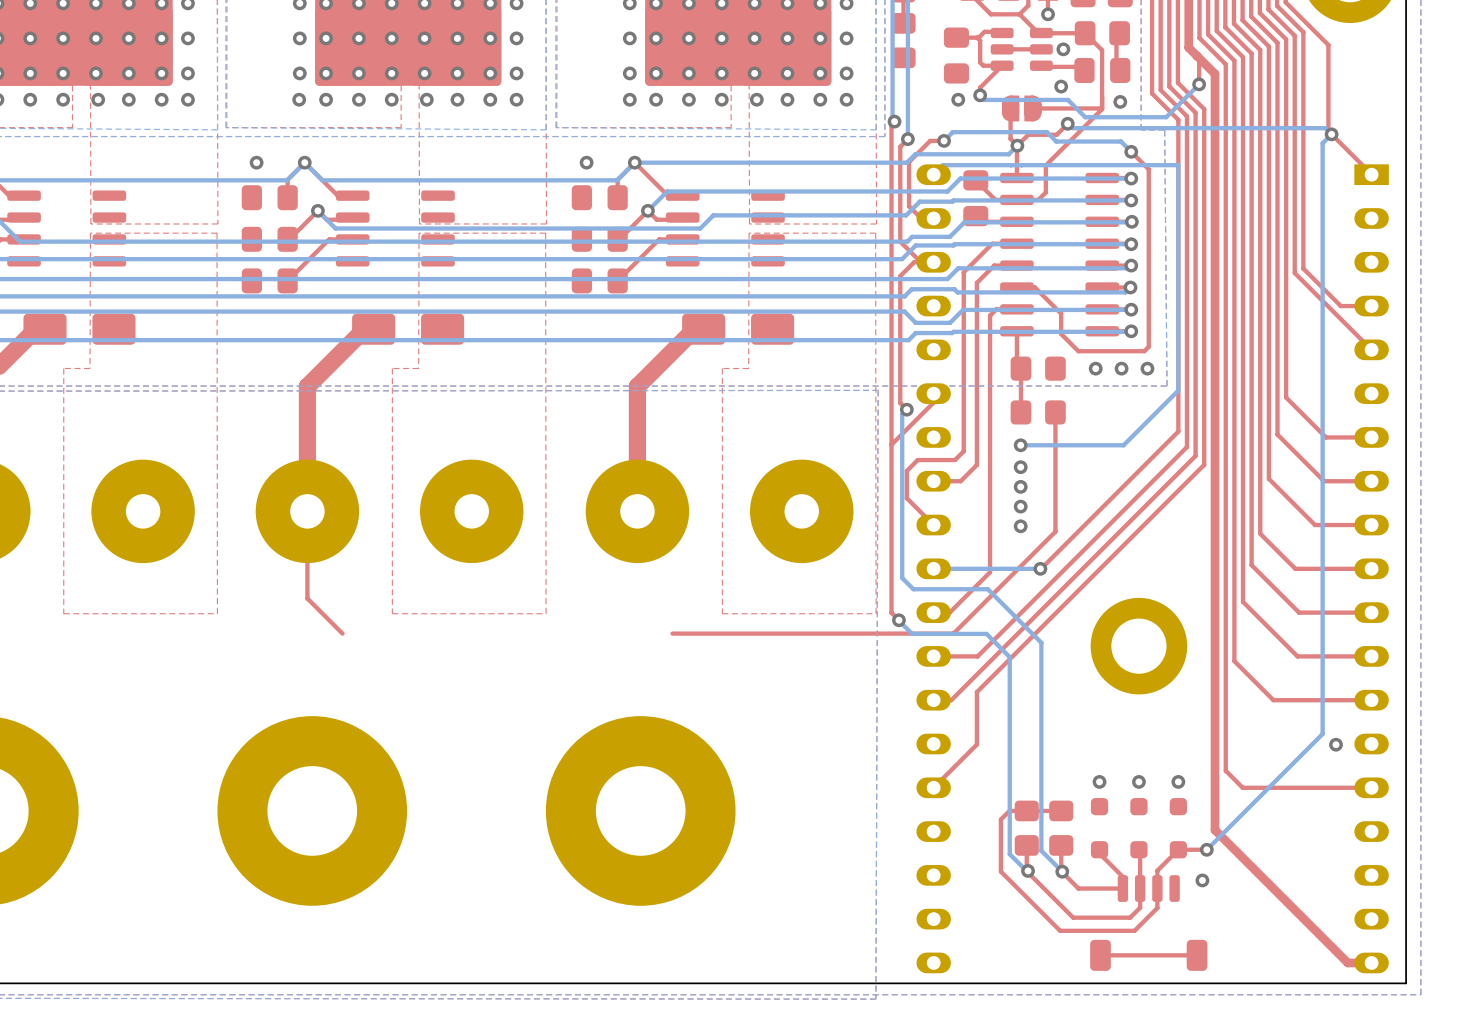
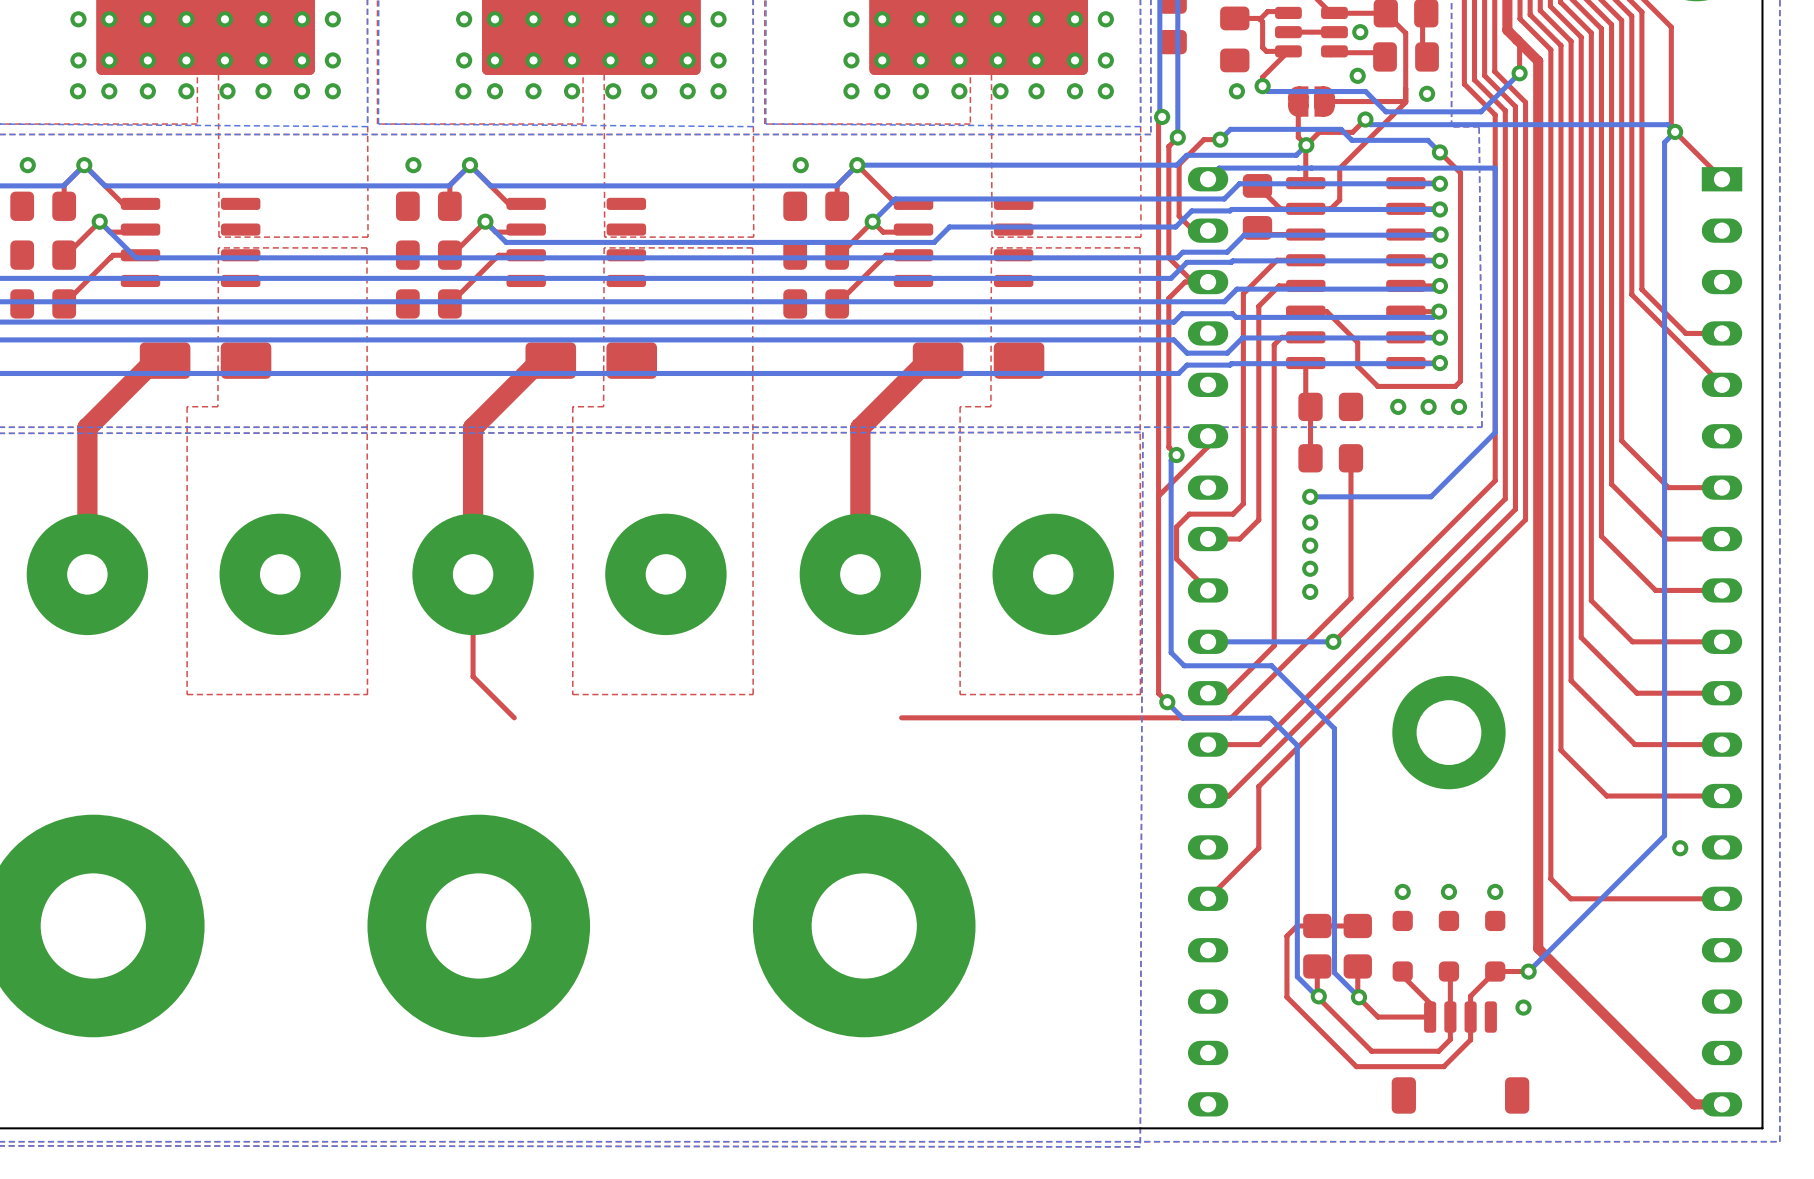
top track: (1197, 955) (1100, 955) -> none

